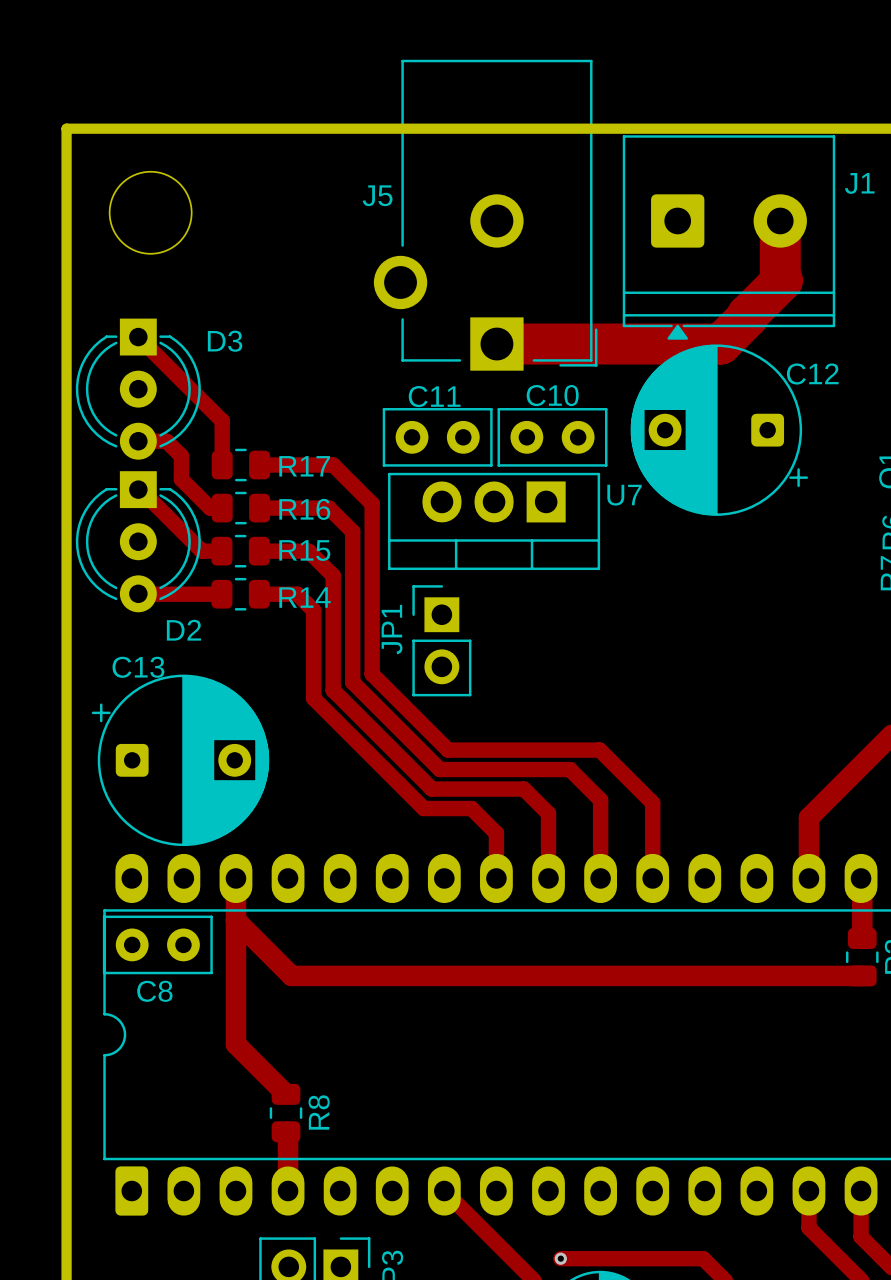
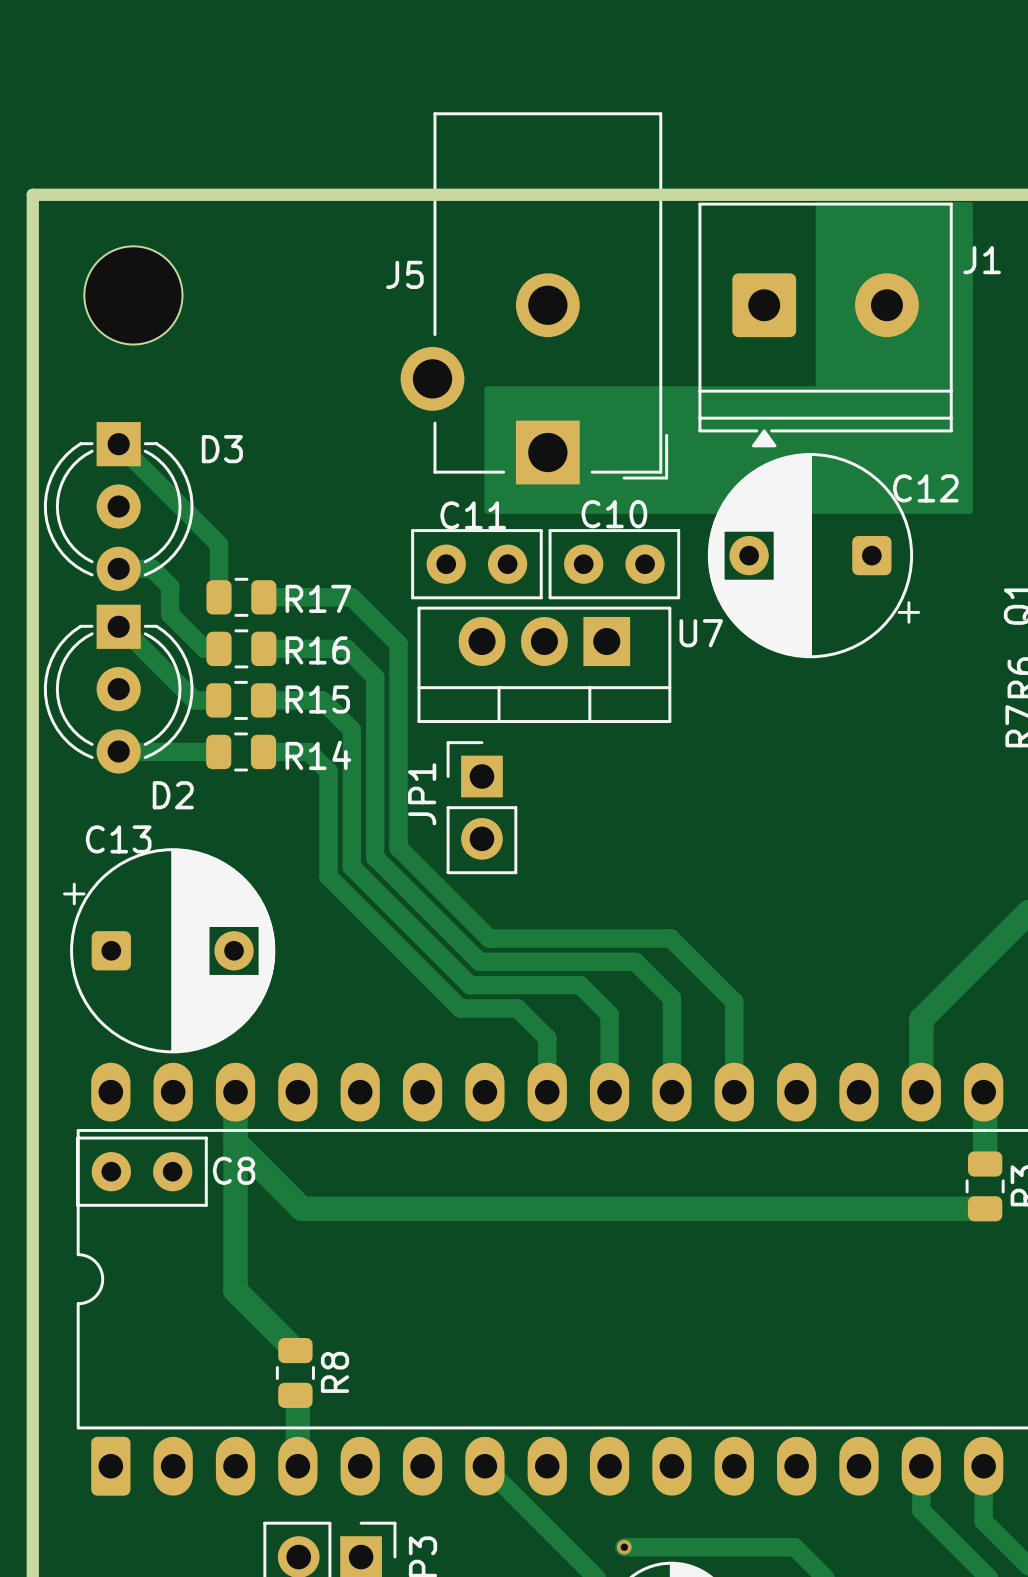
drawing: none -> [484, 202, 973, 514]
track: (780, 220) (780, 278) (782, 280) (720, 344) (496, 344) -> none
C8 name position: C8 (154, 991) -> C8 (234, 1170)

